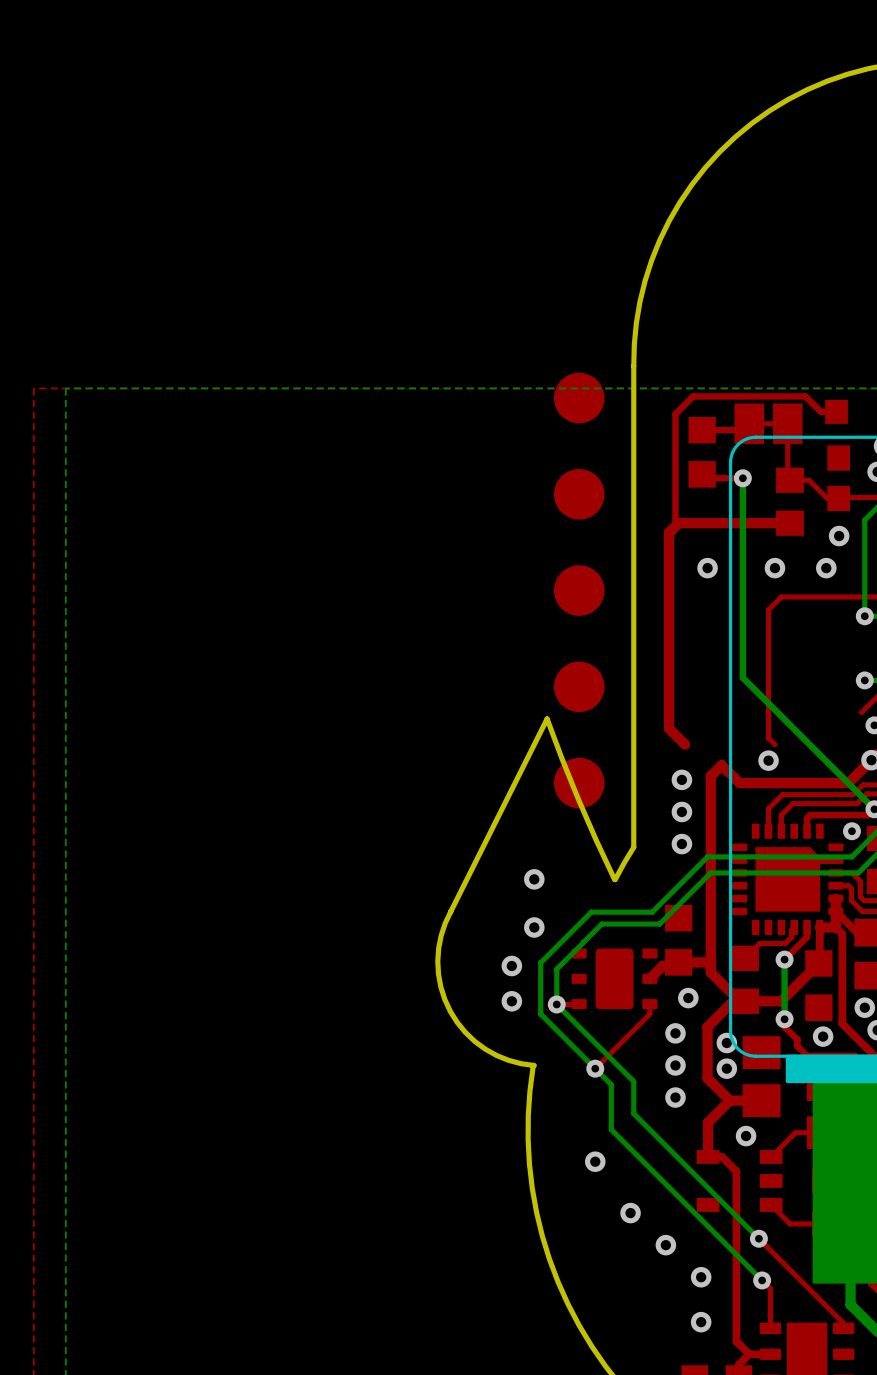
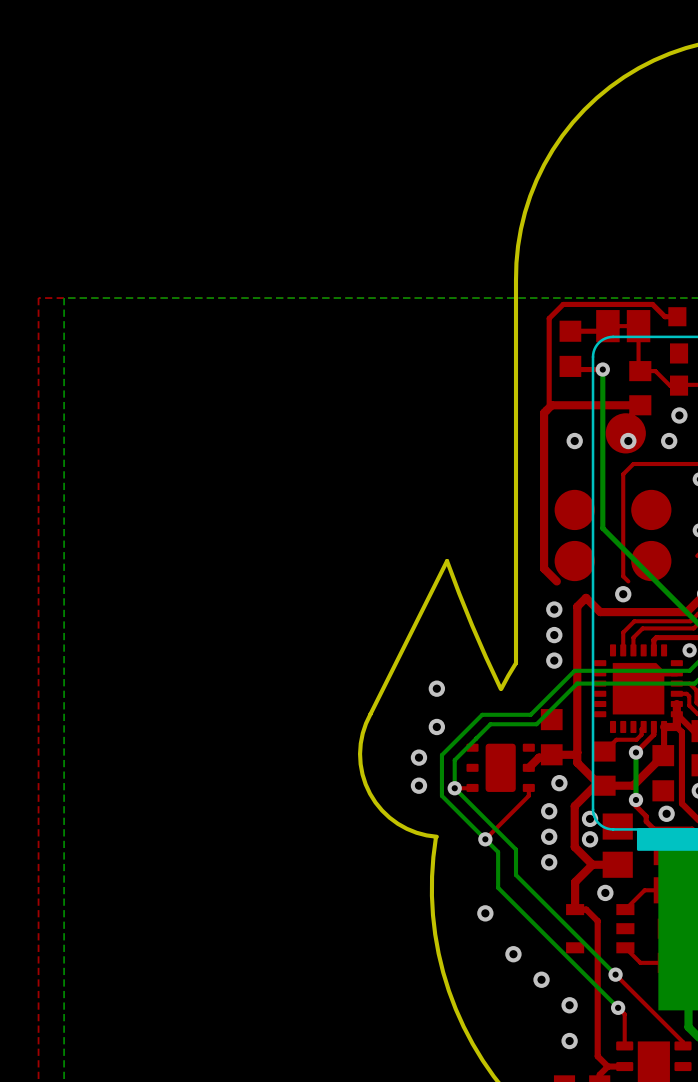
part: (579, 398) -> none
part: (579, 494) -> none
part: none -> (625, 433)
part: (579, 590) -> none
part: none -> (574, 509)
part: none -> (651, 509)
part: (579, 686) -> none
part: none -> (574, 561)
part: none -> (651, 561)
part: (579, 783) -> none

